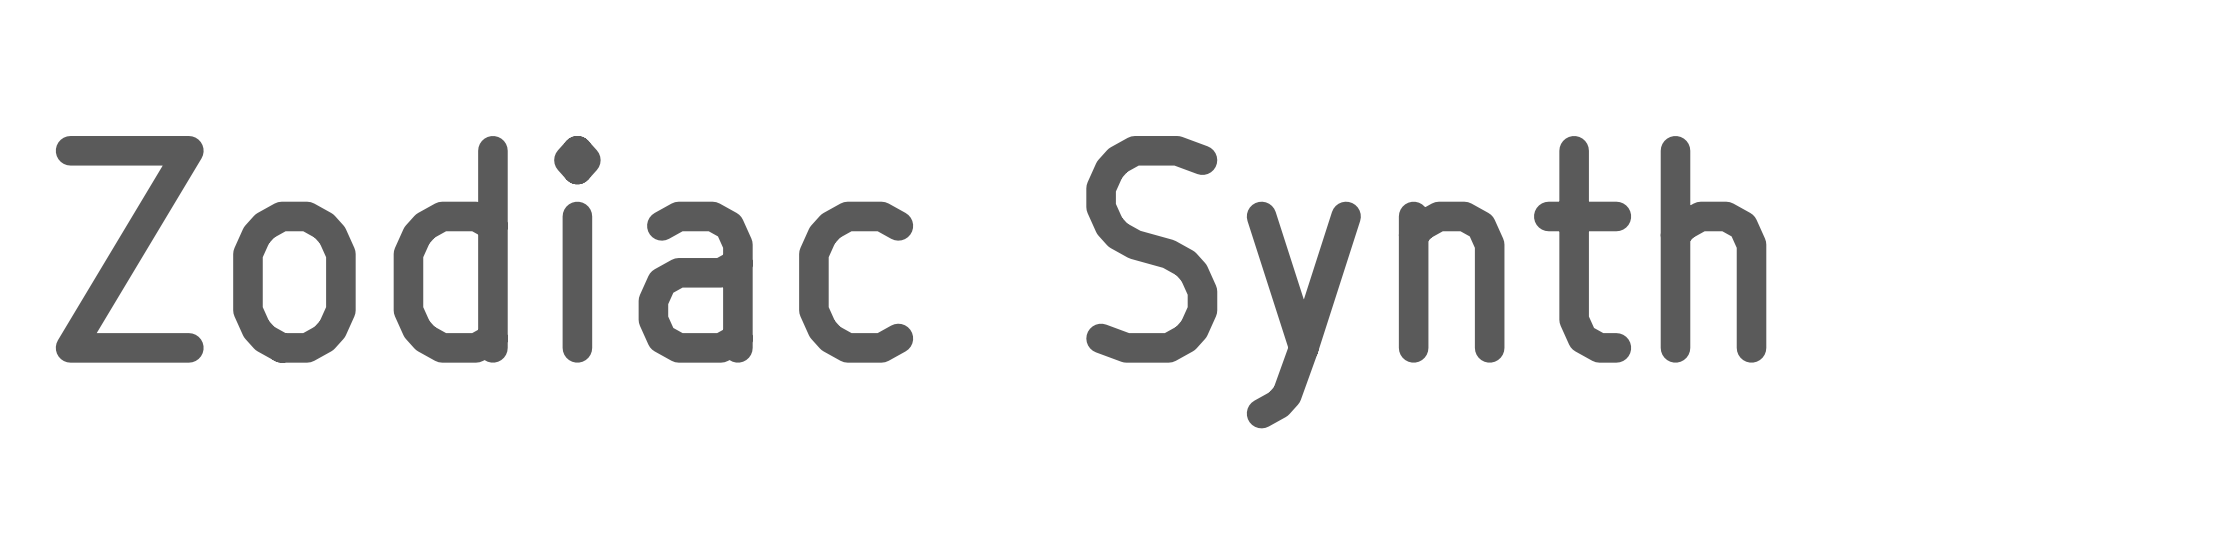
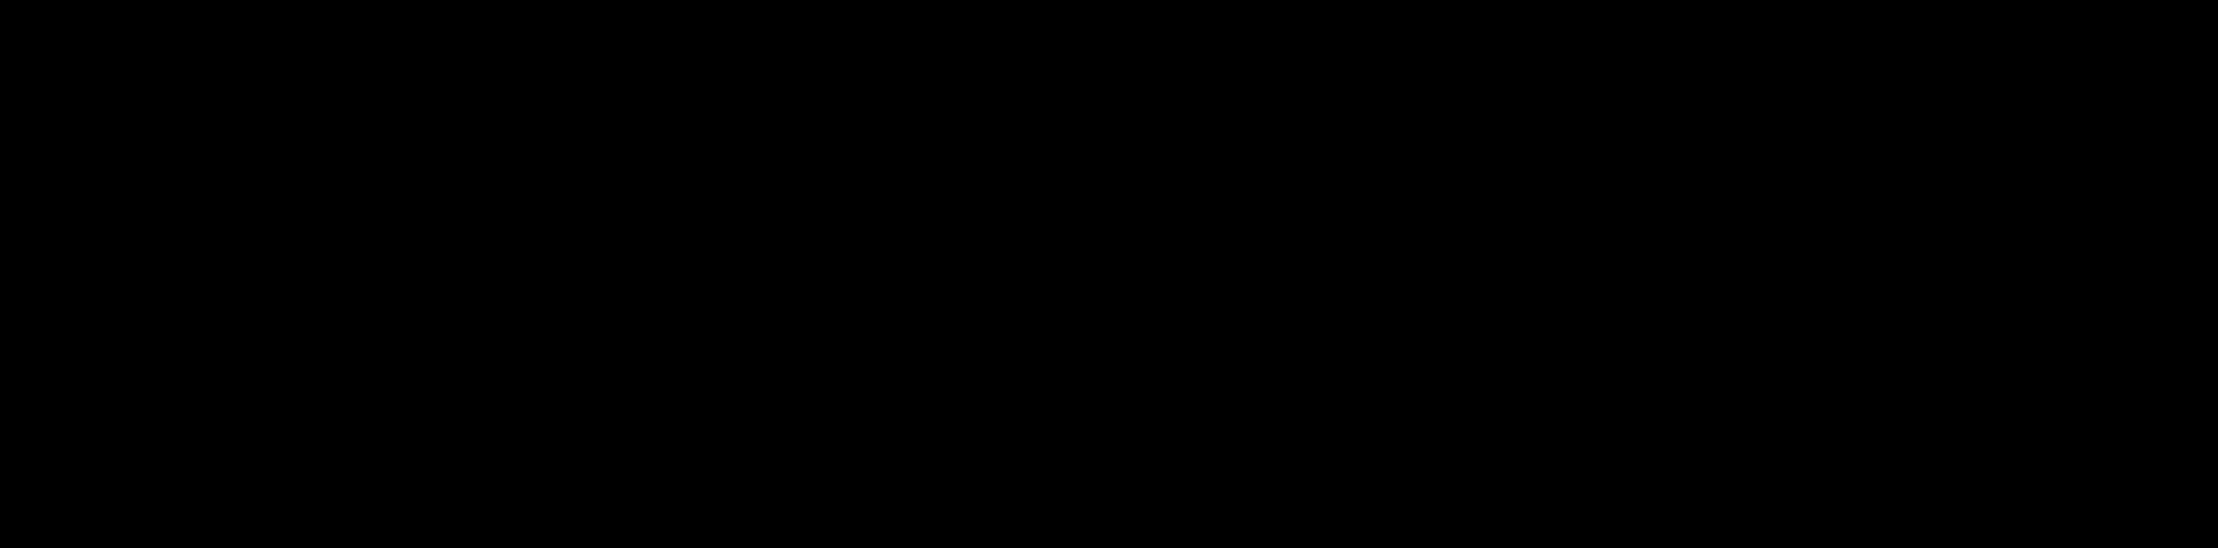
text: Zodiac Synth (911, 282) -> none

